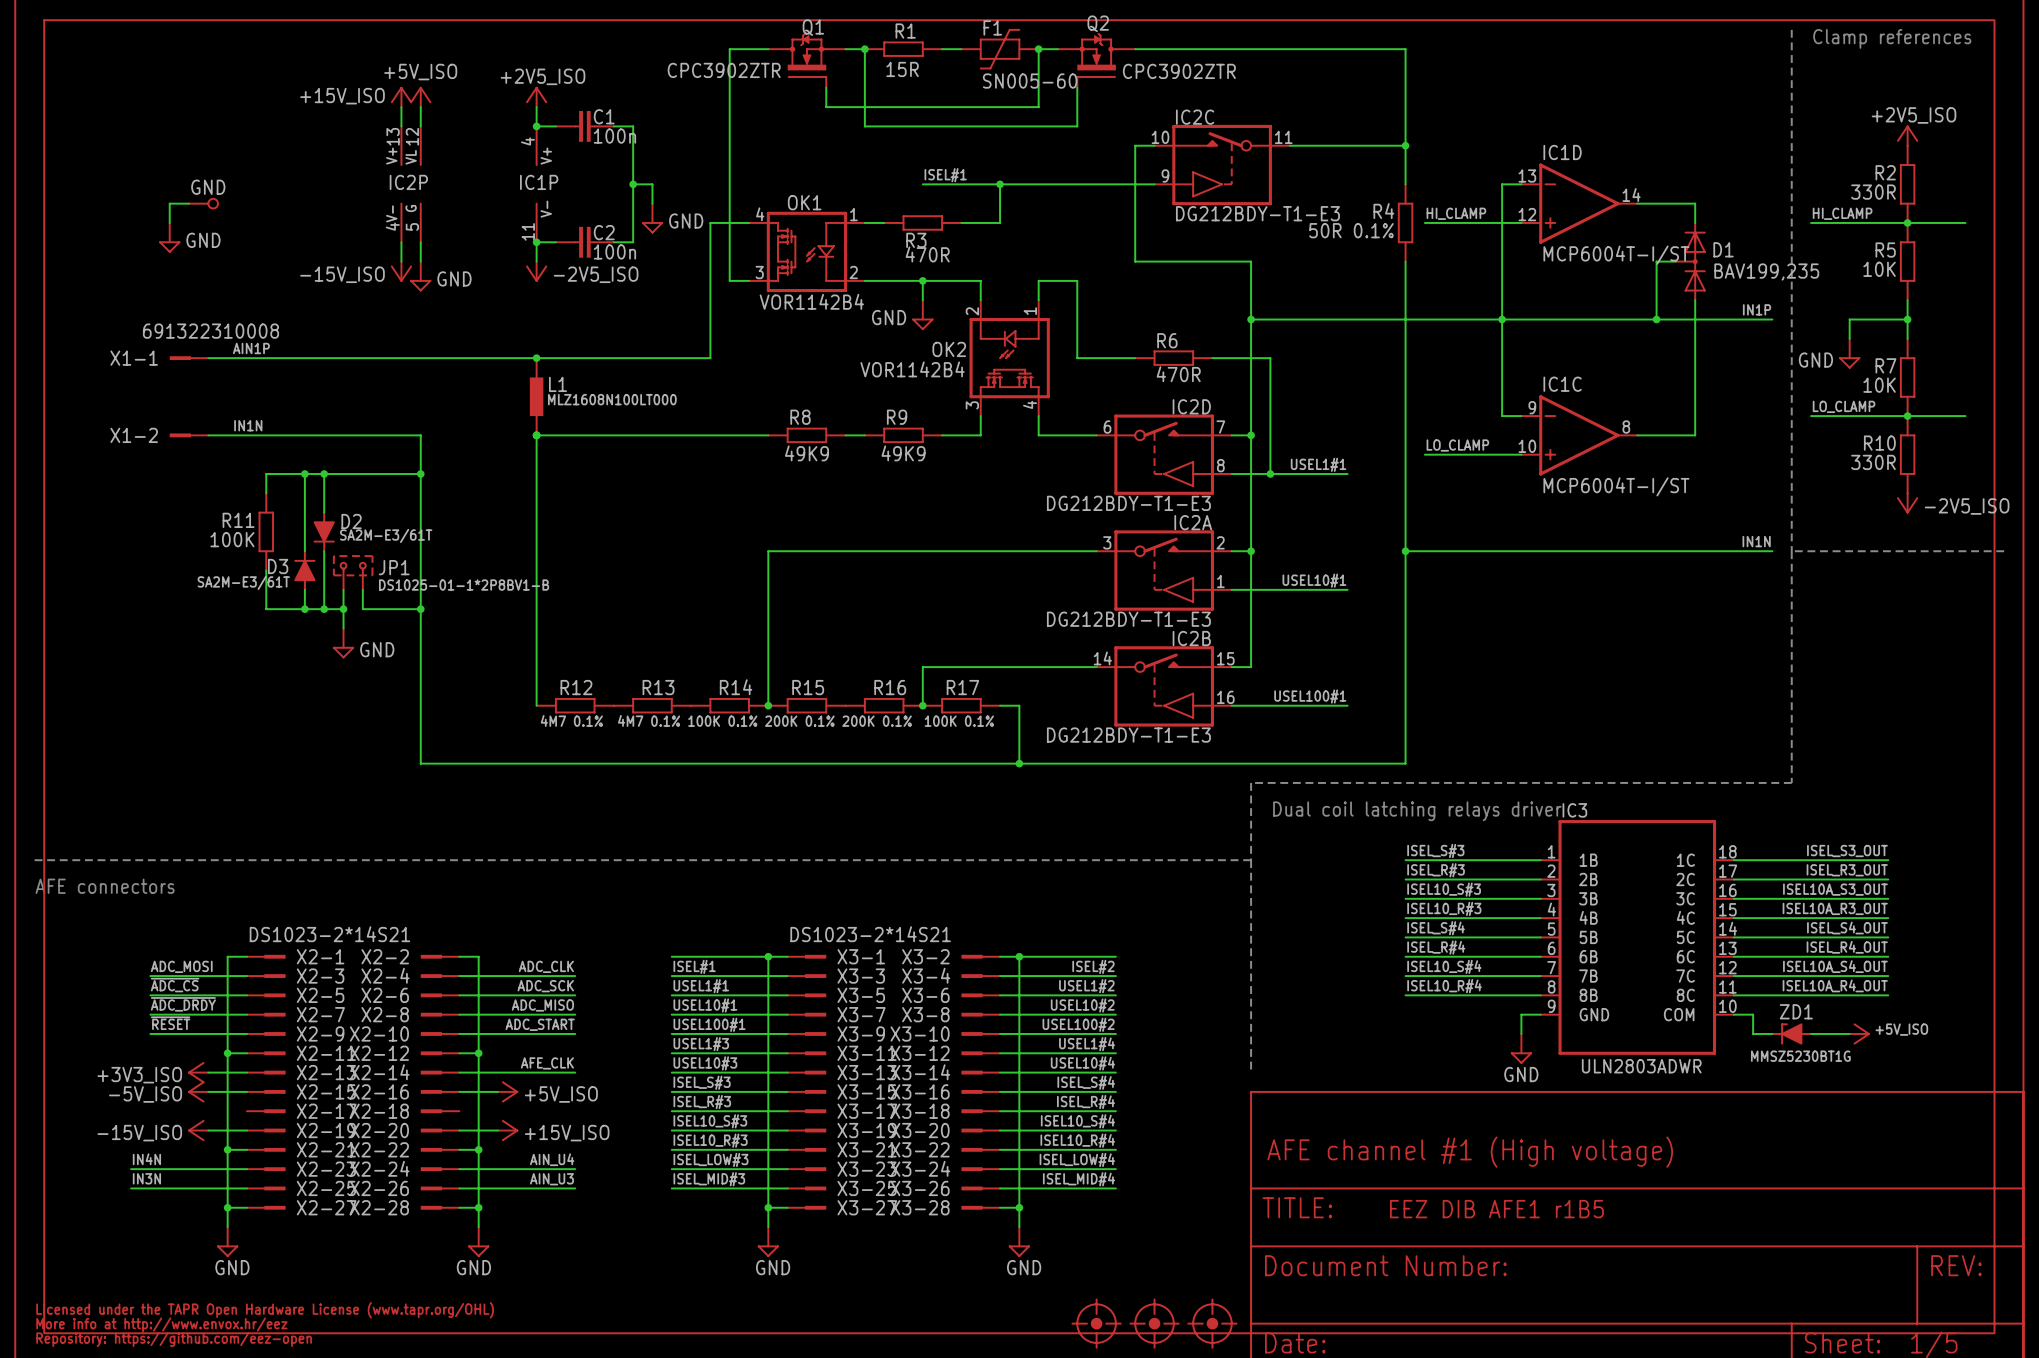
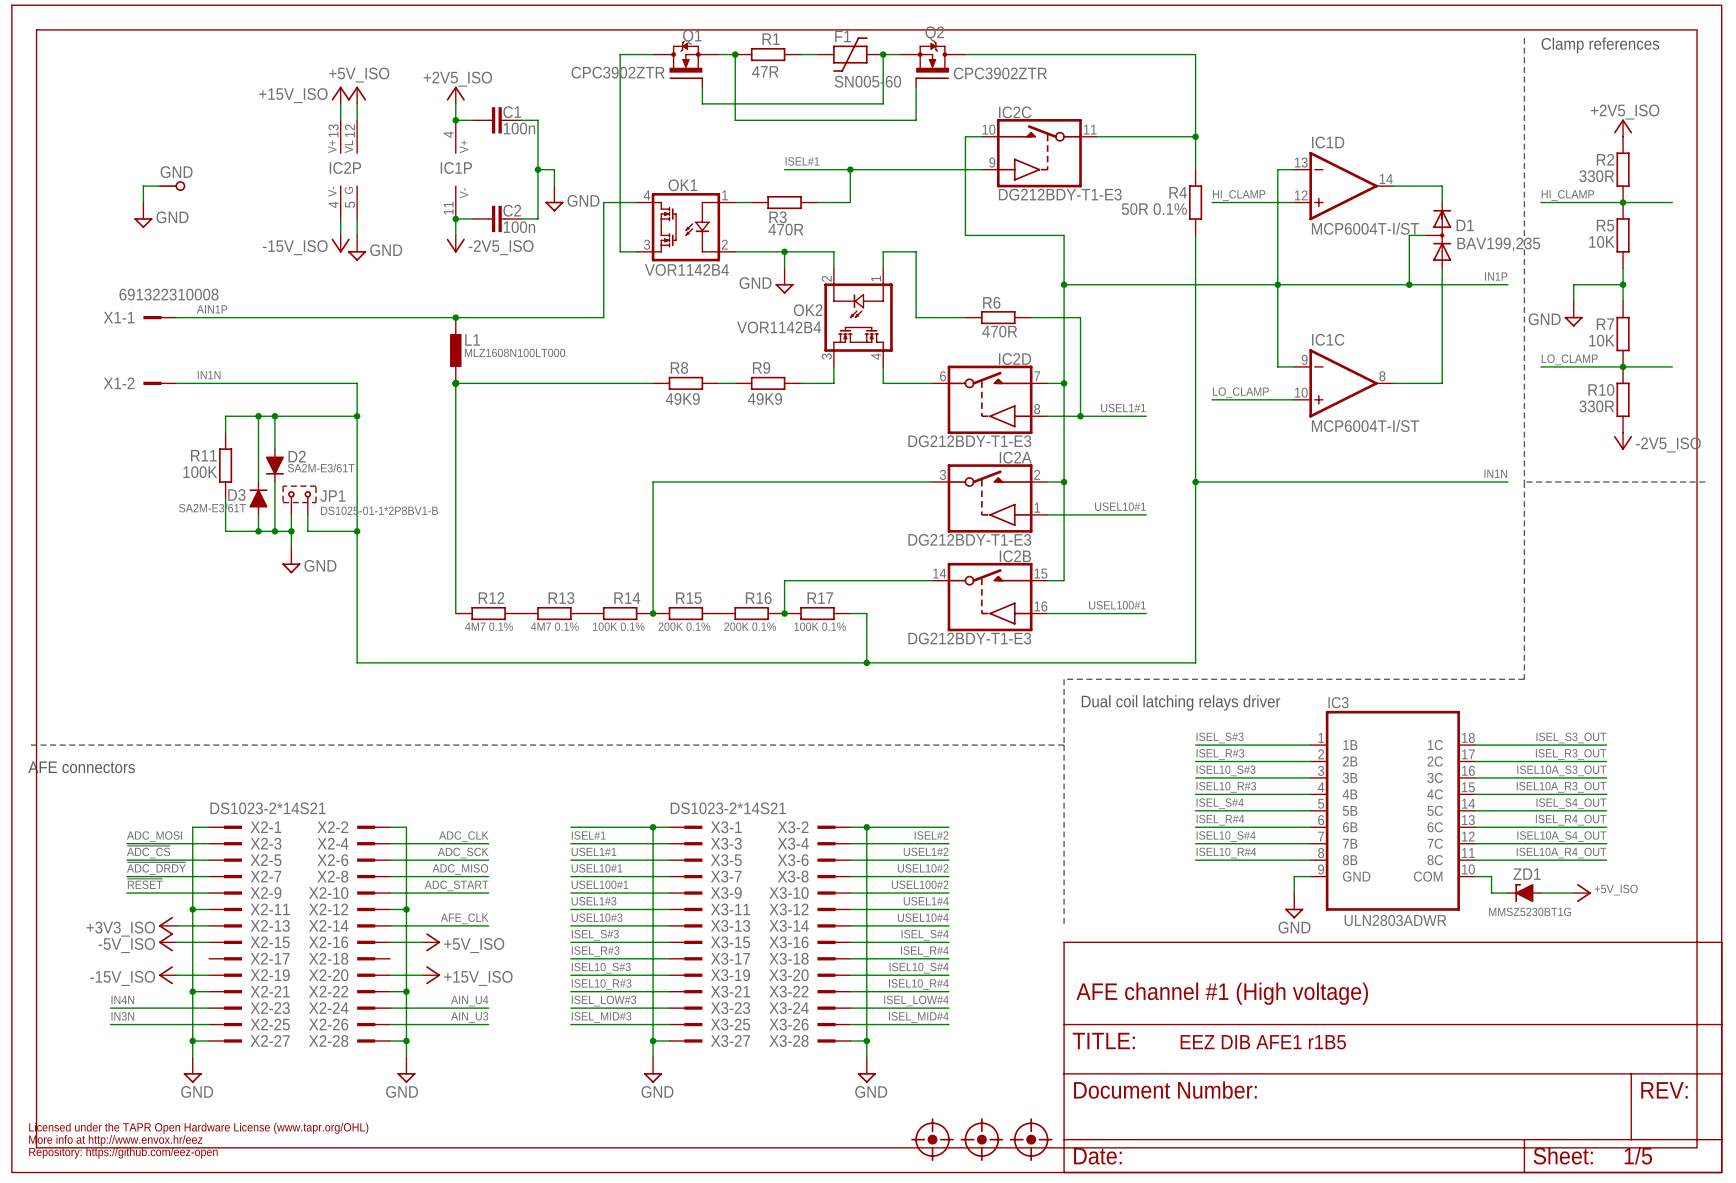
R1 value: 15R (902, 69) -> 47R (765, 71)

